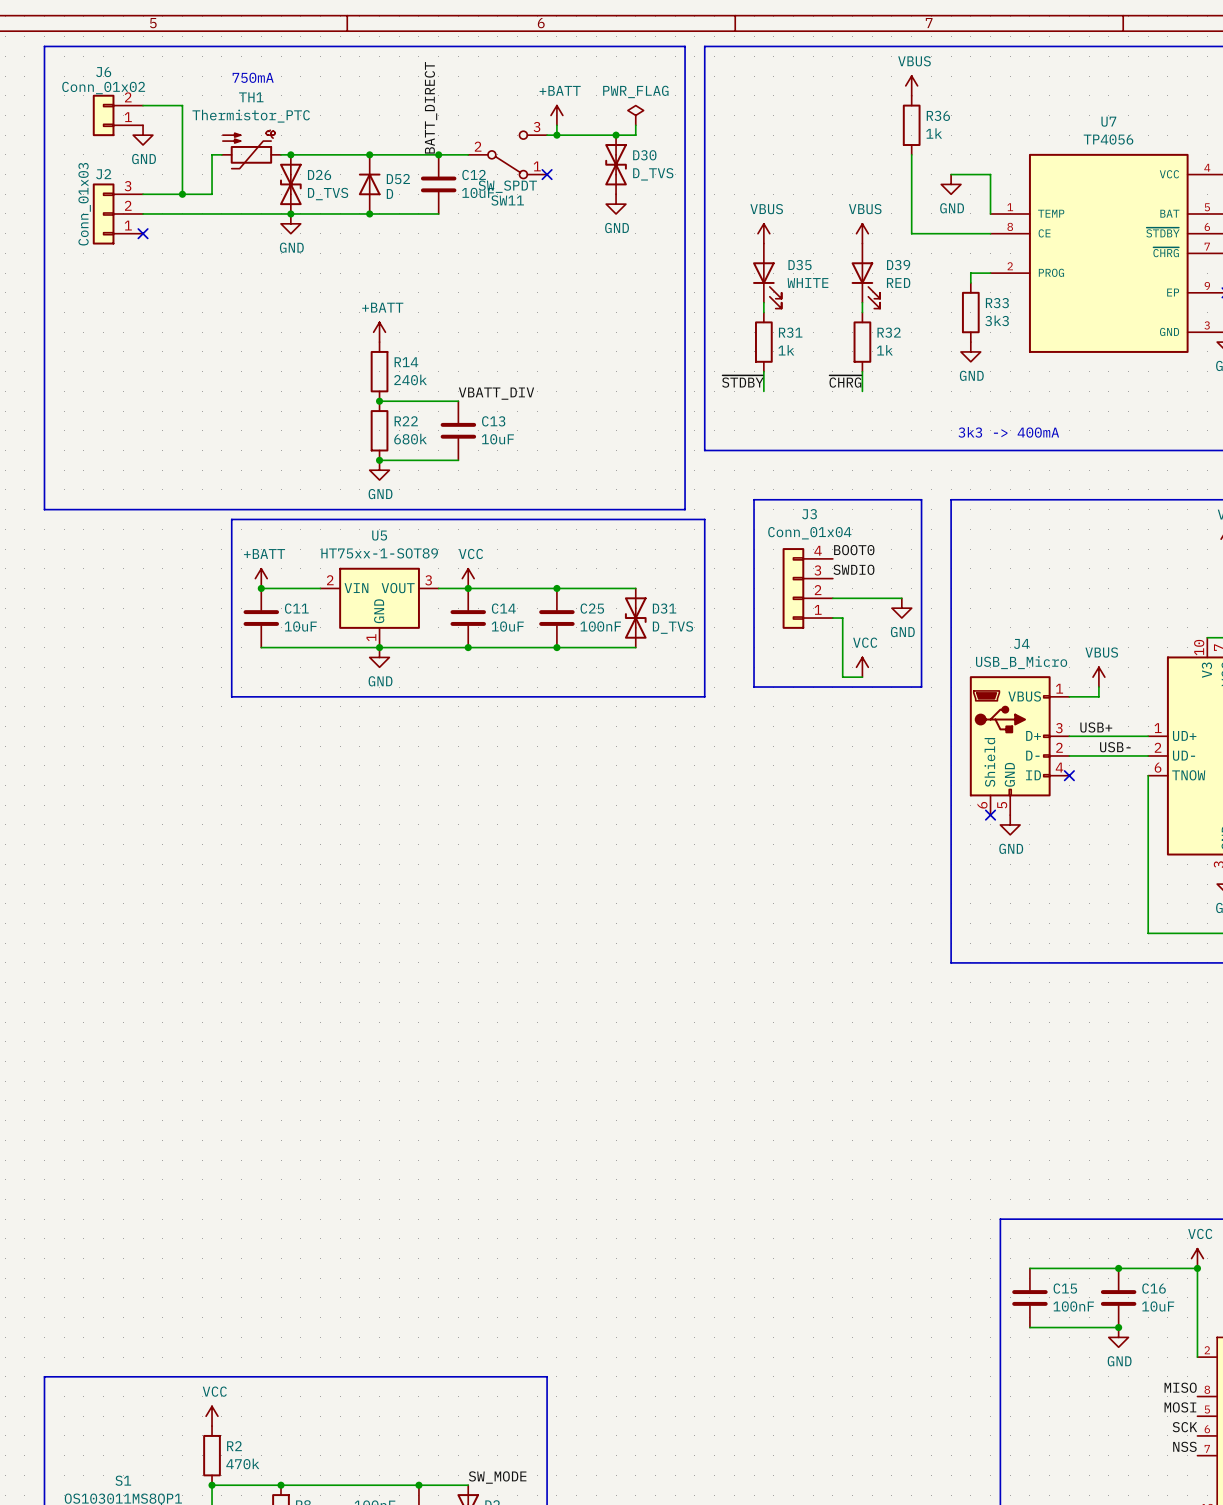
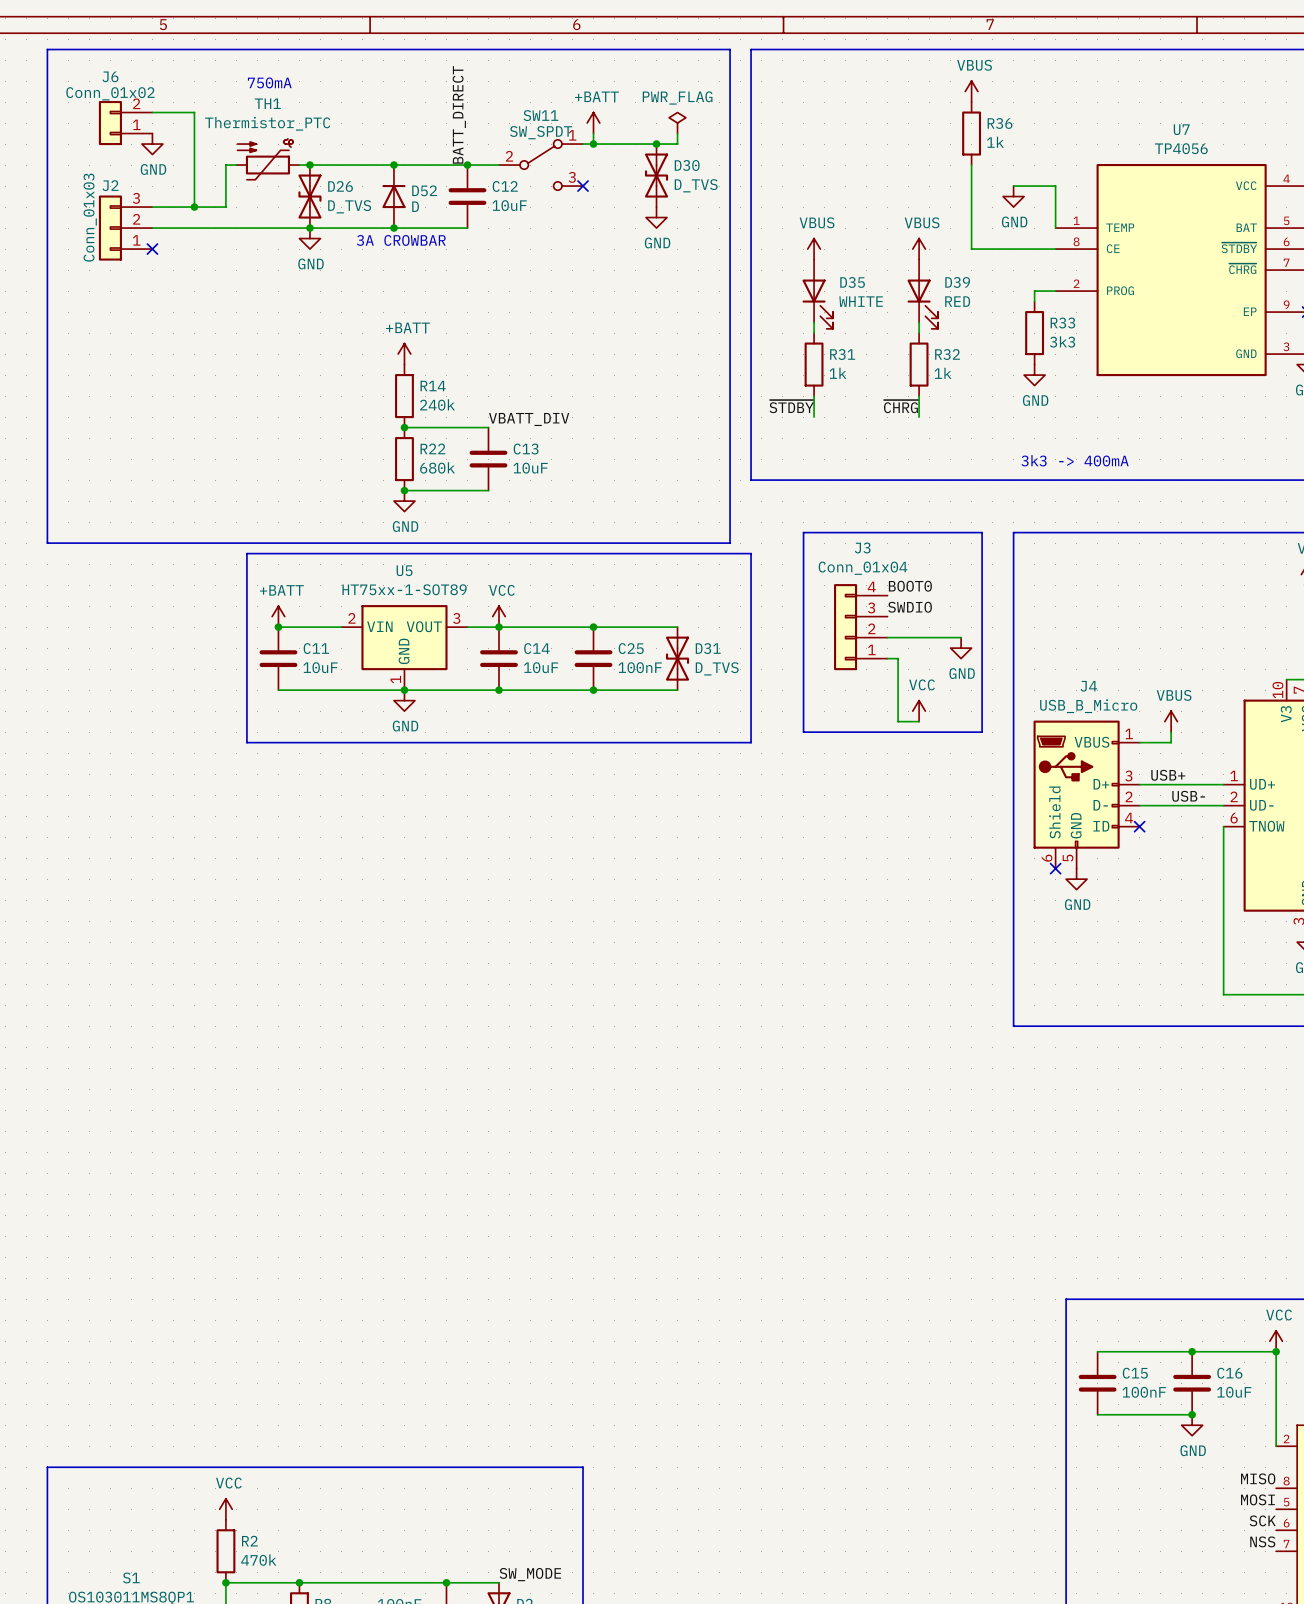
SW11 flip: as is (507, 154) -> up-down (541, 165)
text: none -> 3A CROWBAR (401, 240)

